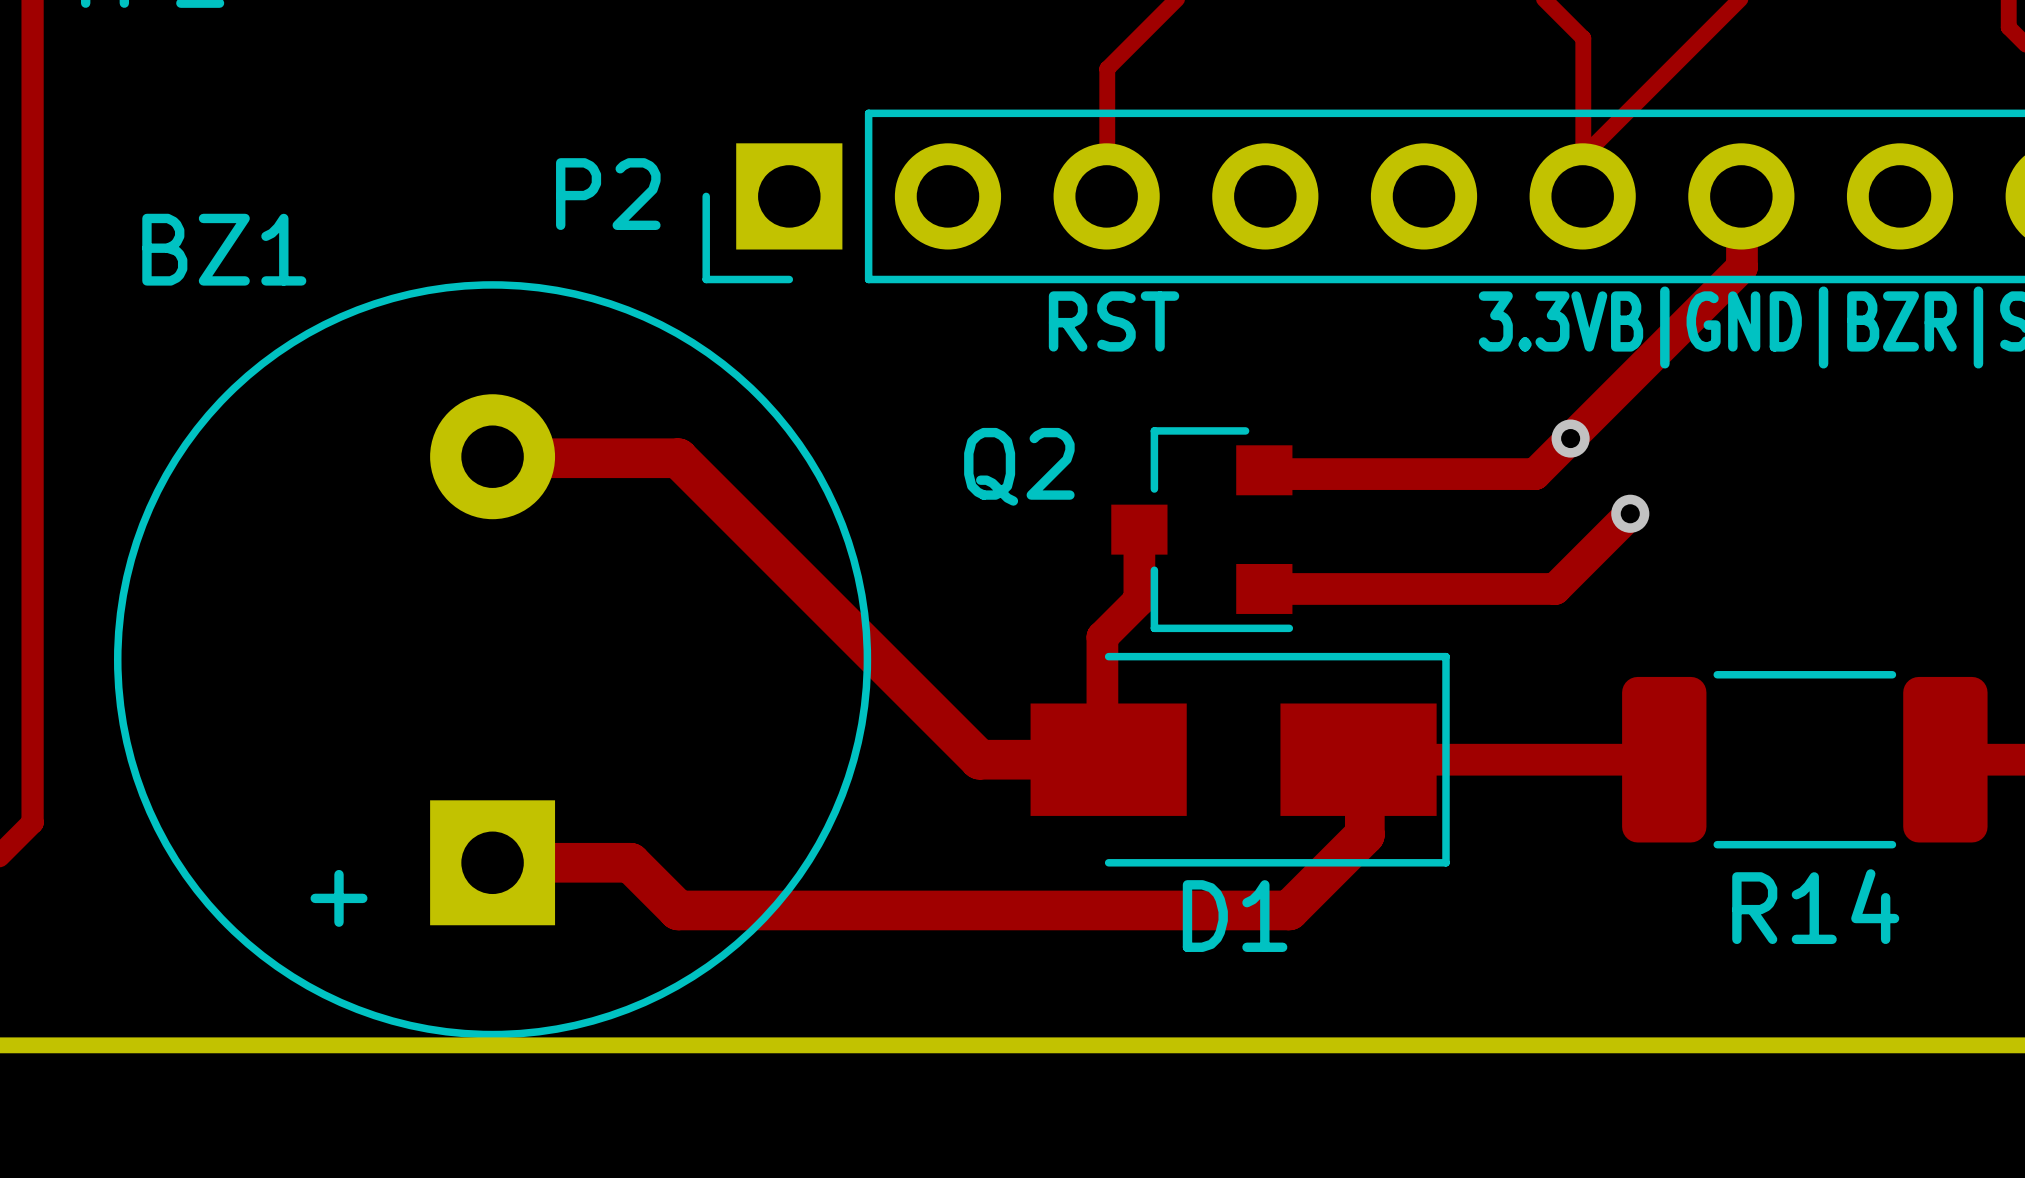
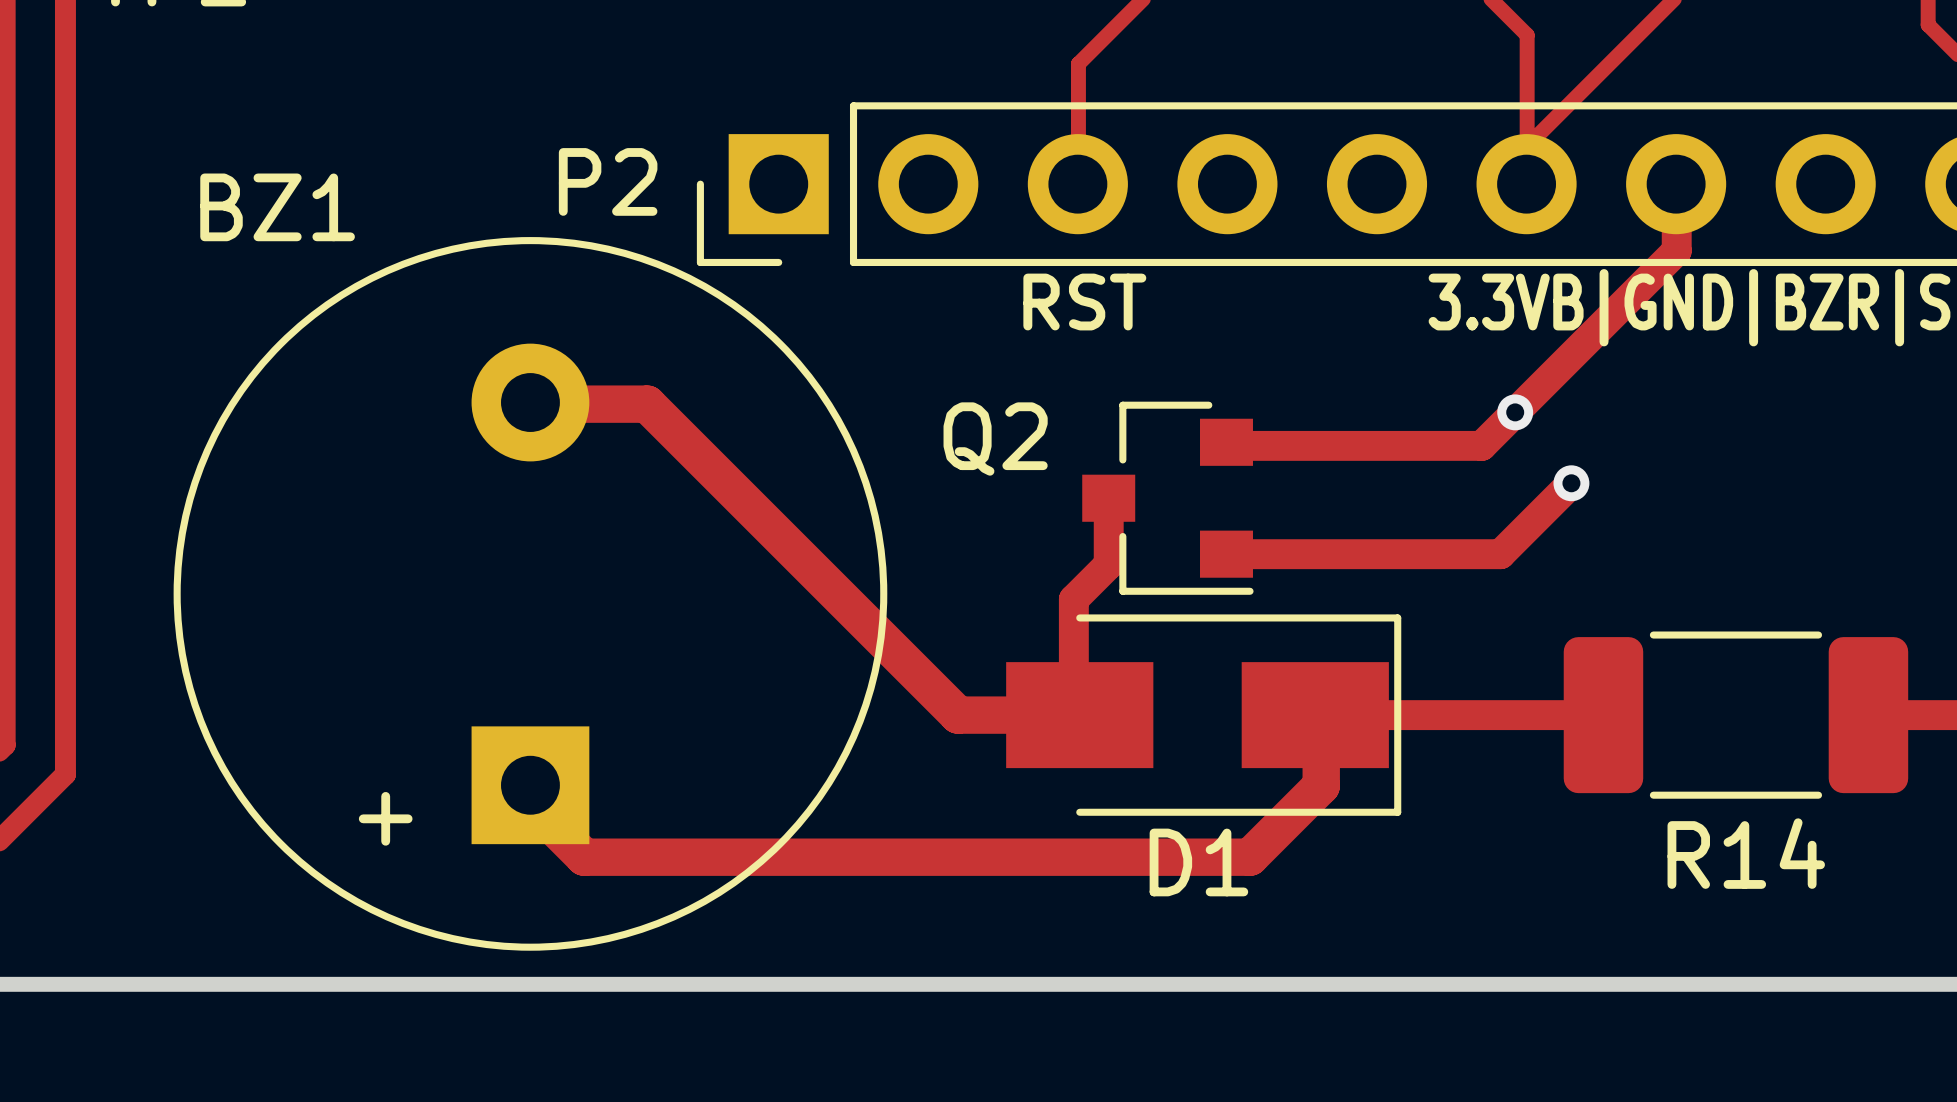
track: (492, 456) (678, 458) -> (531, 404) (647, 404) (674, 430)
BZ1 position: (492, 659) -> (530, 593)
track: (492, 862) (630, 862) (678, 910) -> (531, 786) (531, 804) (584, 857) (674, 857)

